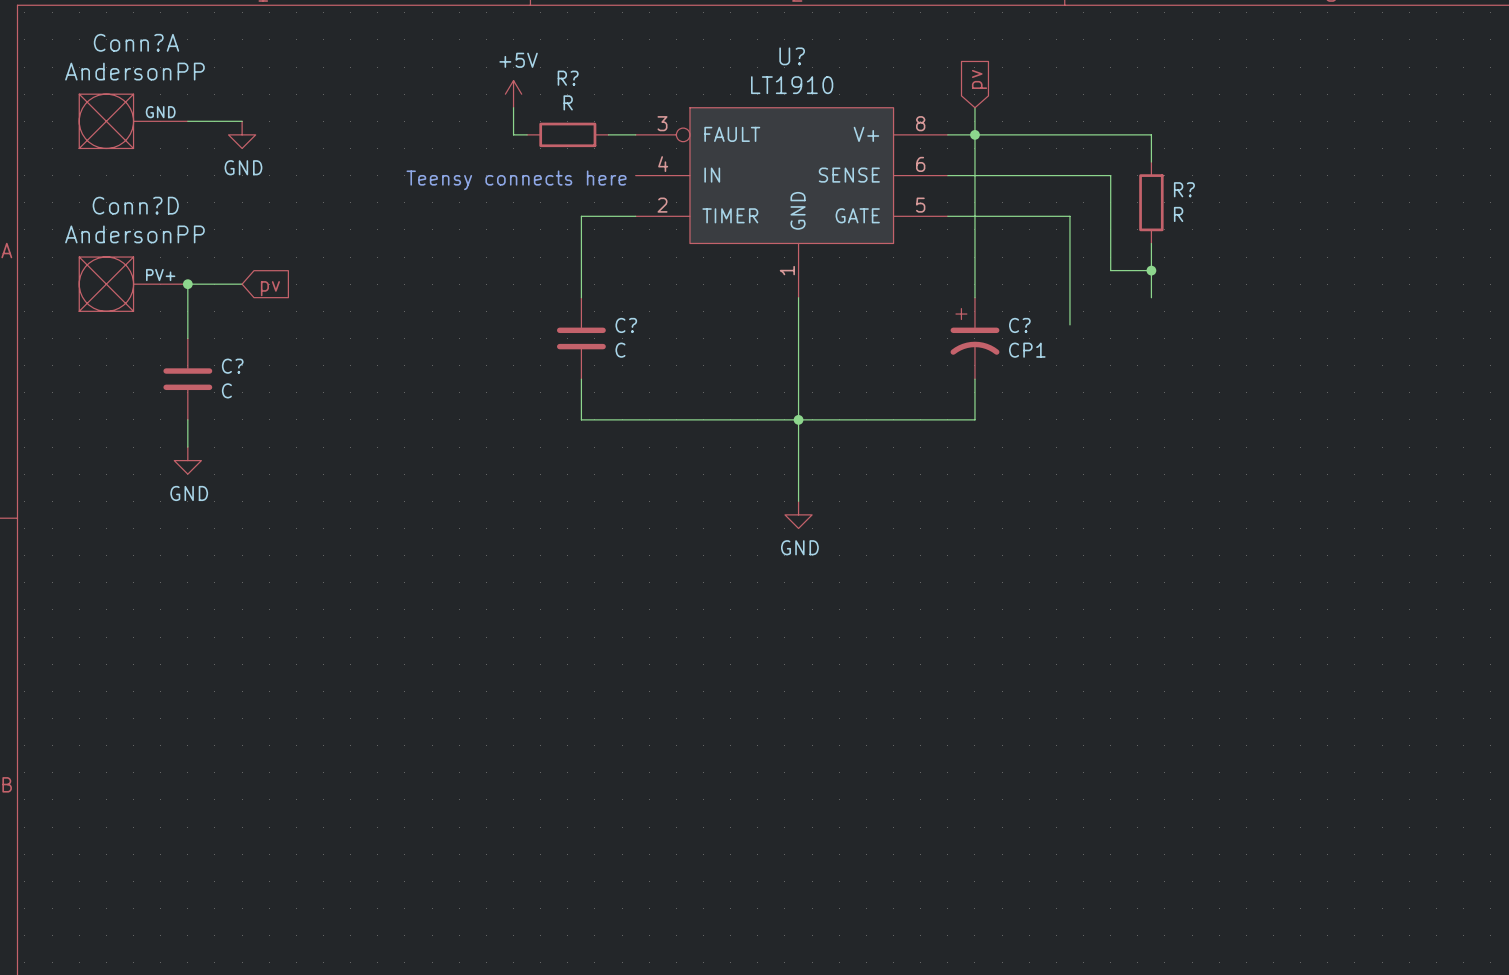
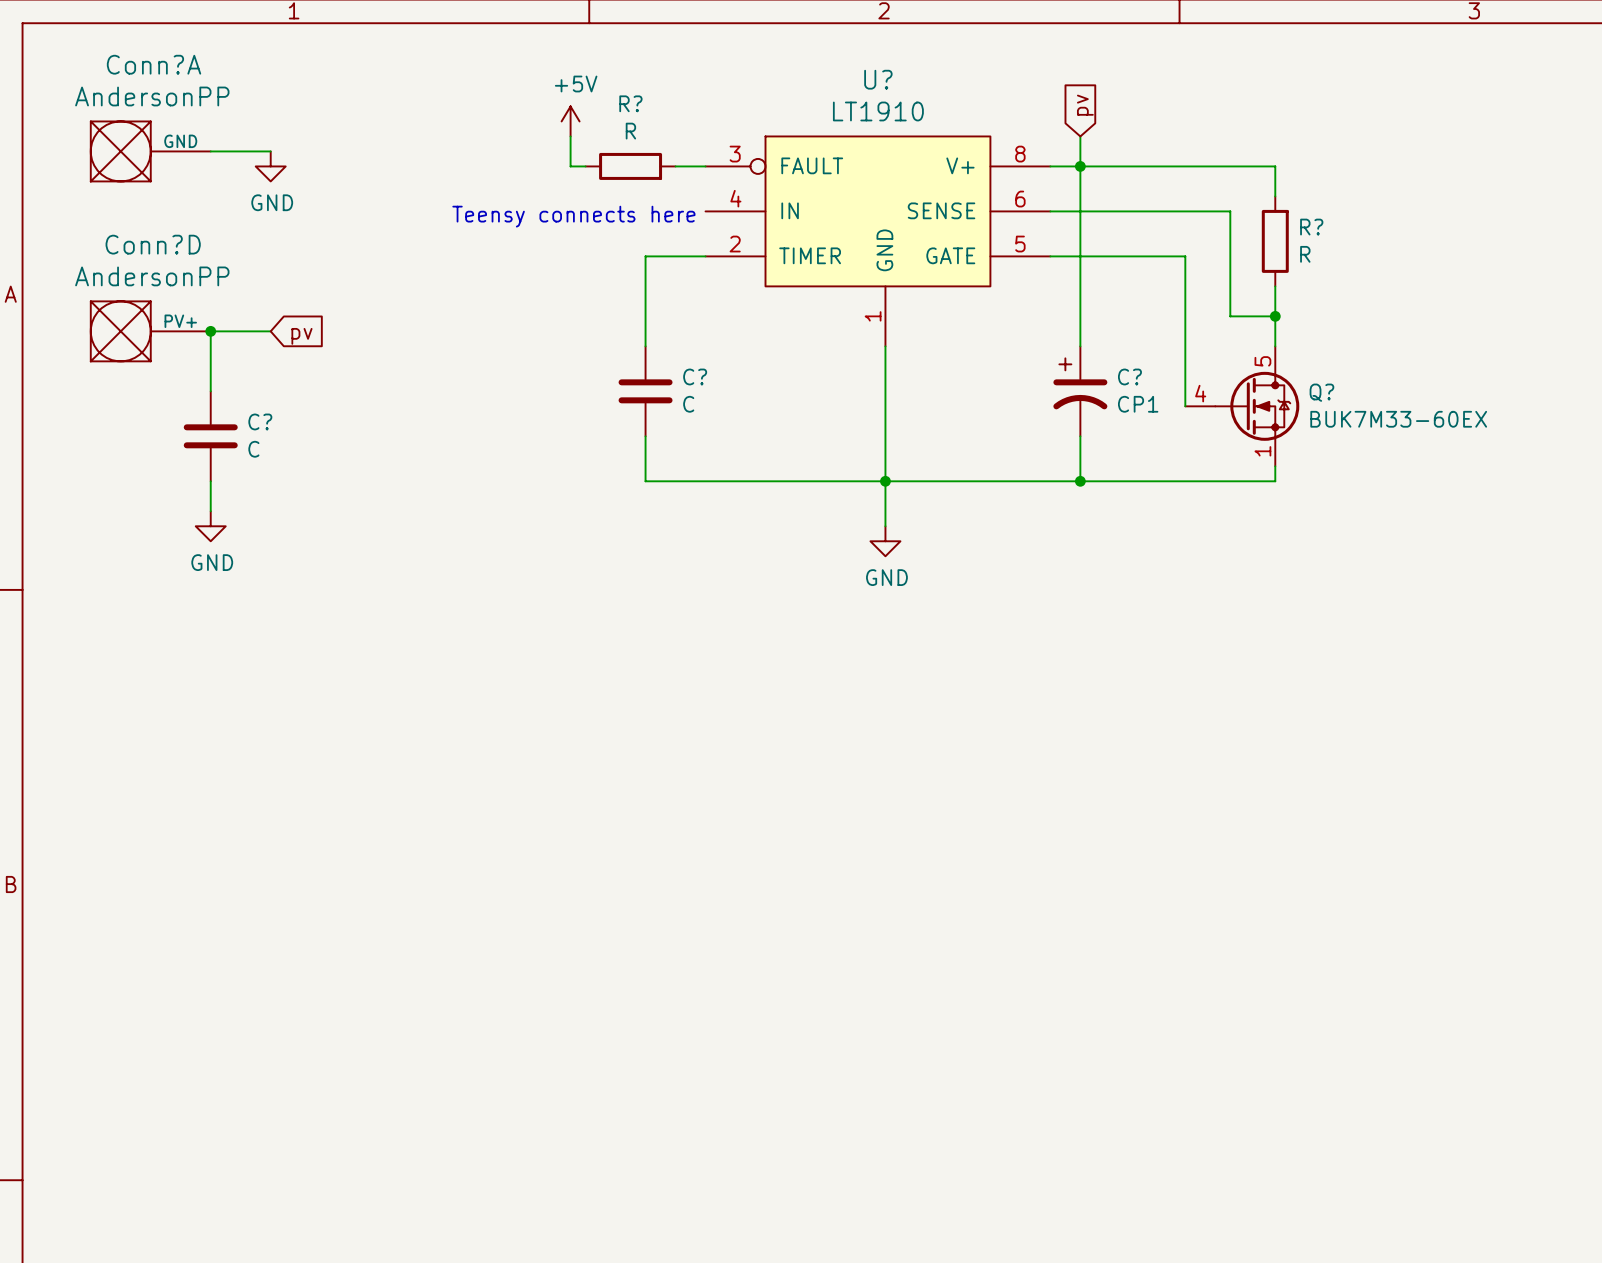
wire: none -> (1185, 376) (1185, 406)
Q?: none -> BUK7M33-60EX (1242, 406)
wire: none -> (1275, 466) (1275, 481) (1080, 481)
junction: none -> (1080, 481)
wire: (798, 460) (798, 501) -> none
power symbol position: GND (798, 514) -> GND (885, 541)

